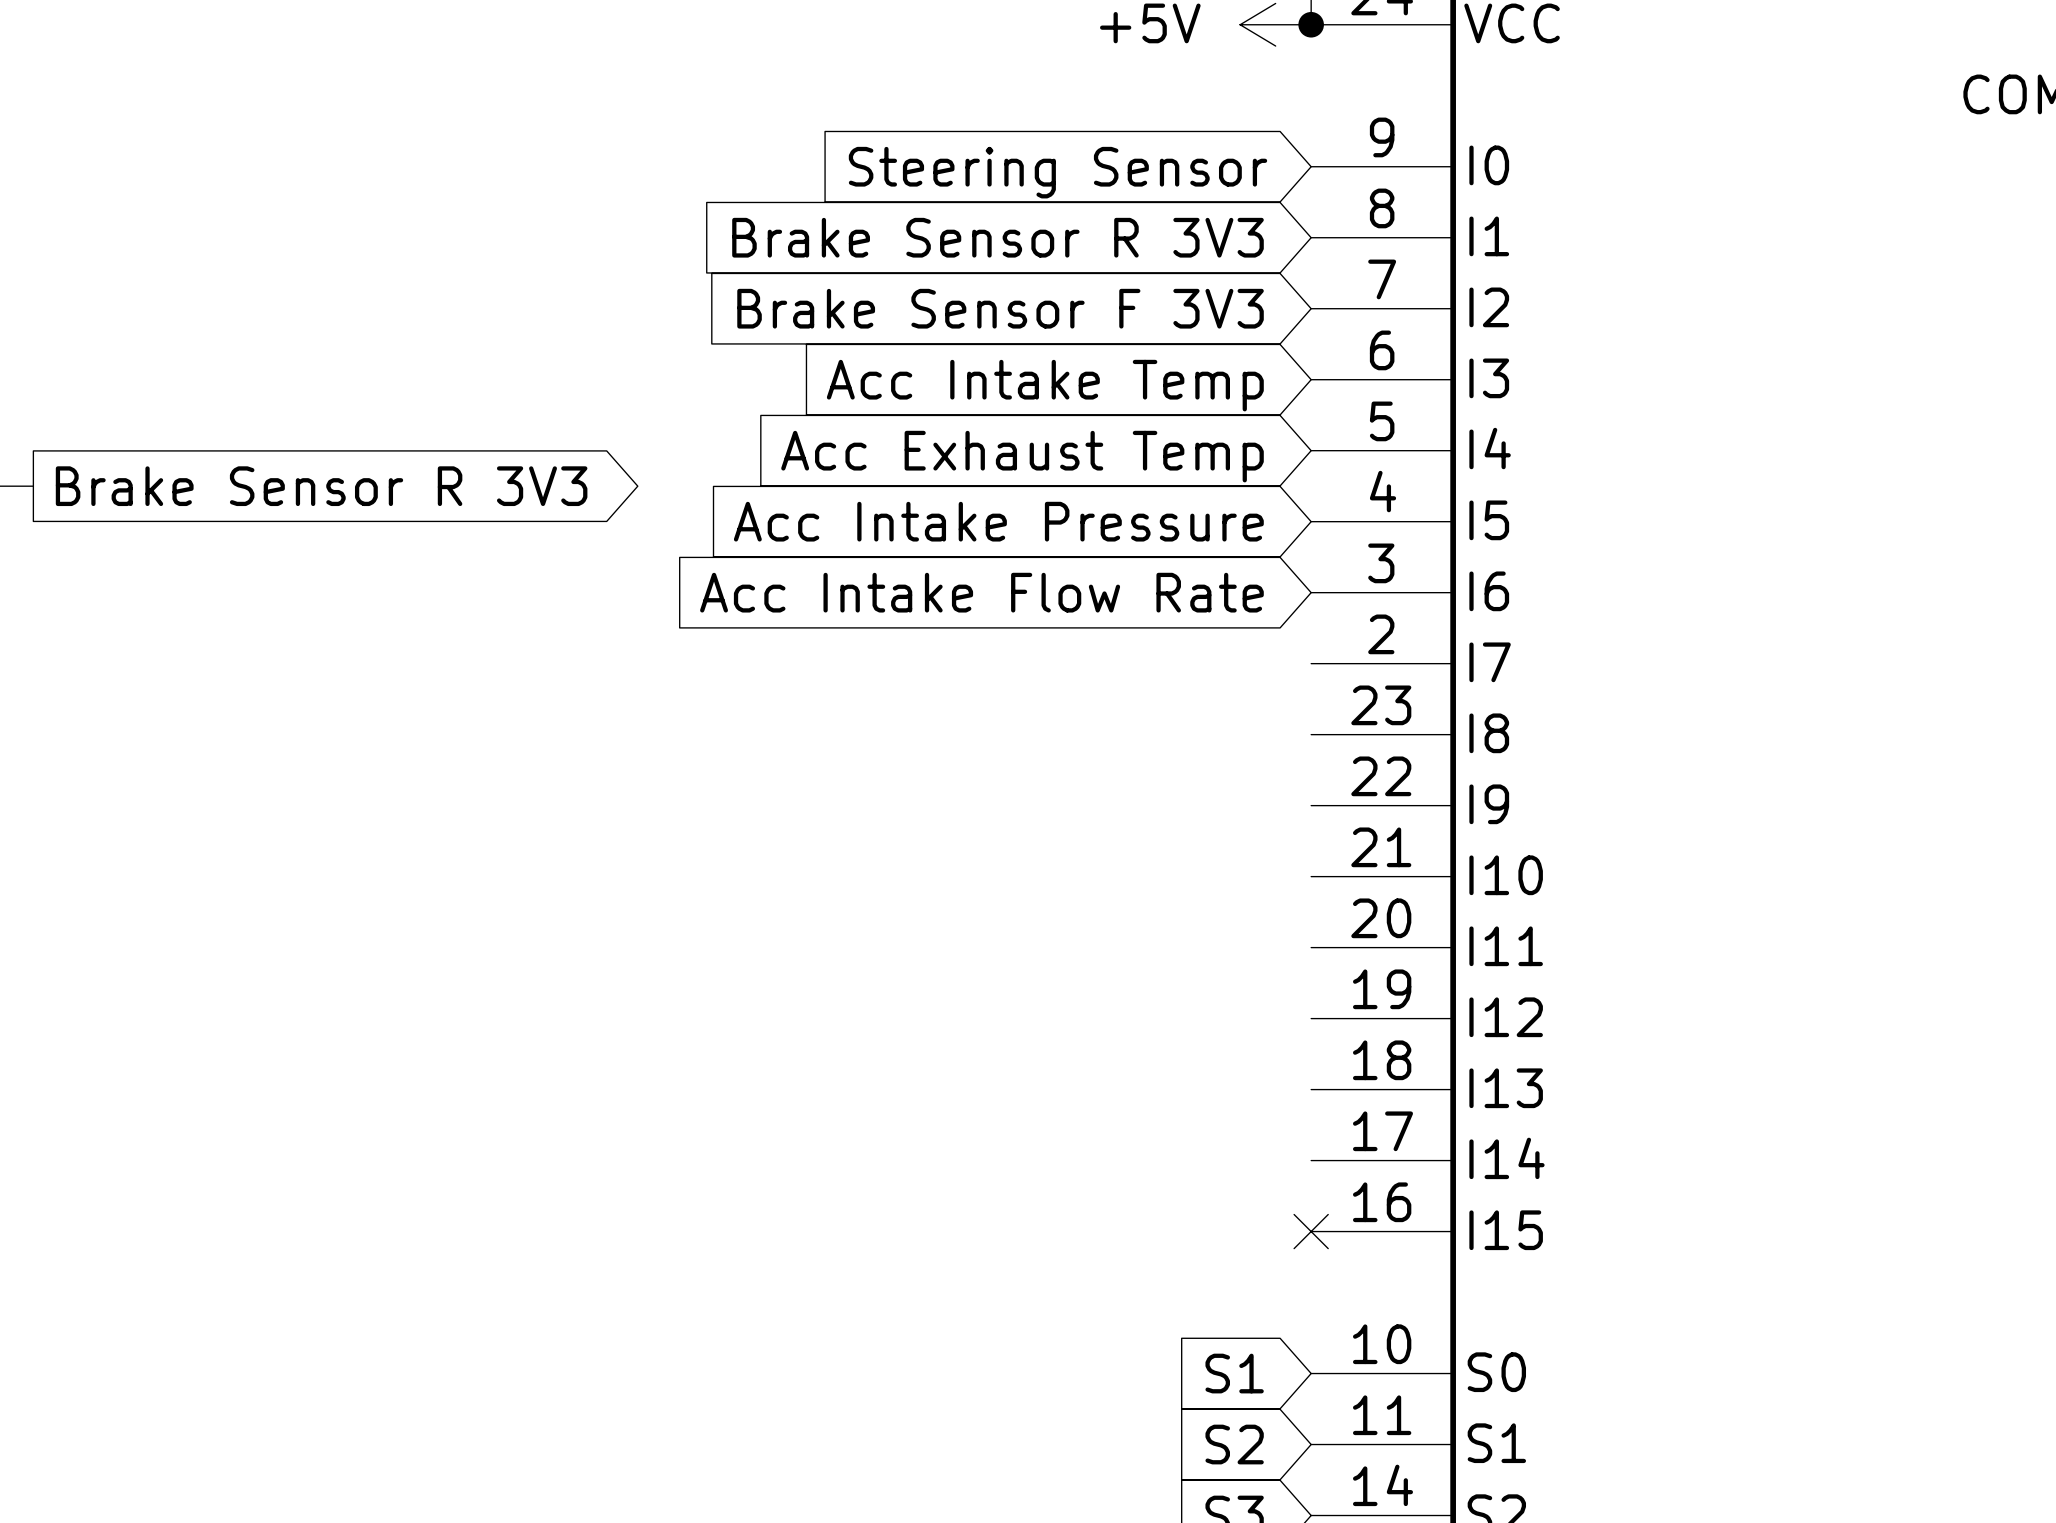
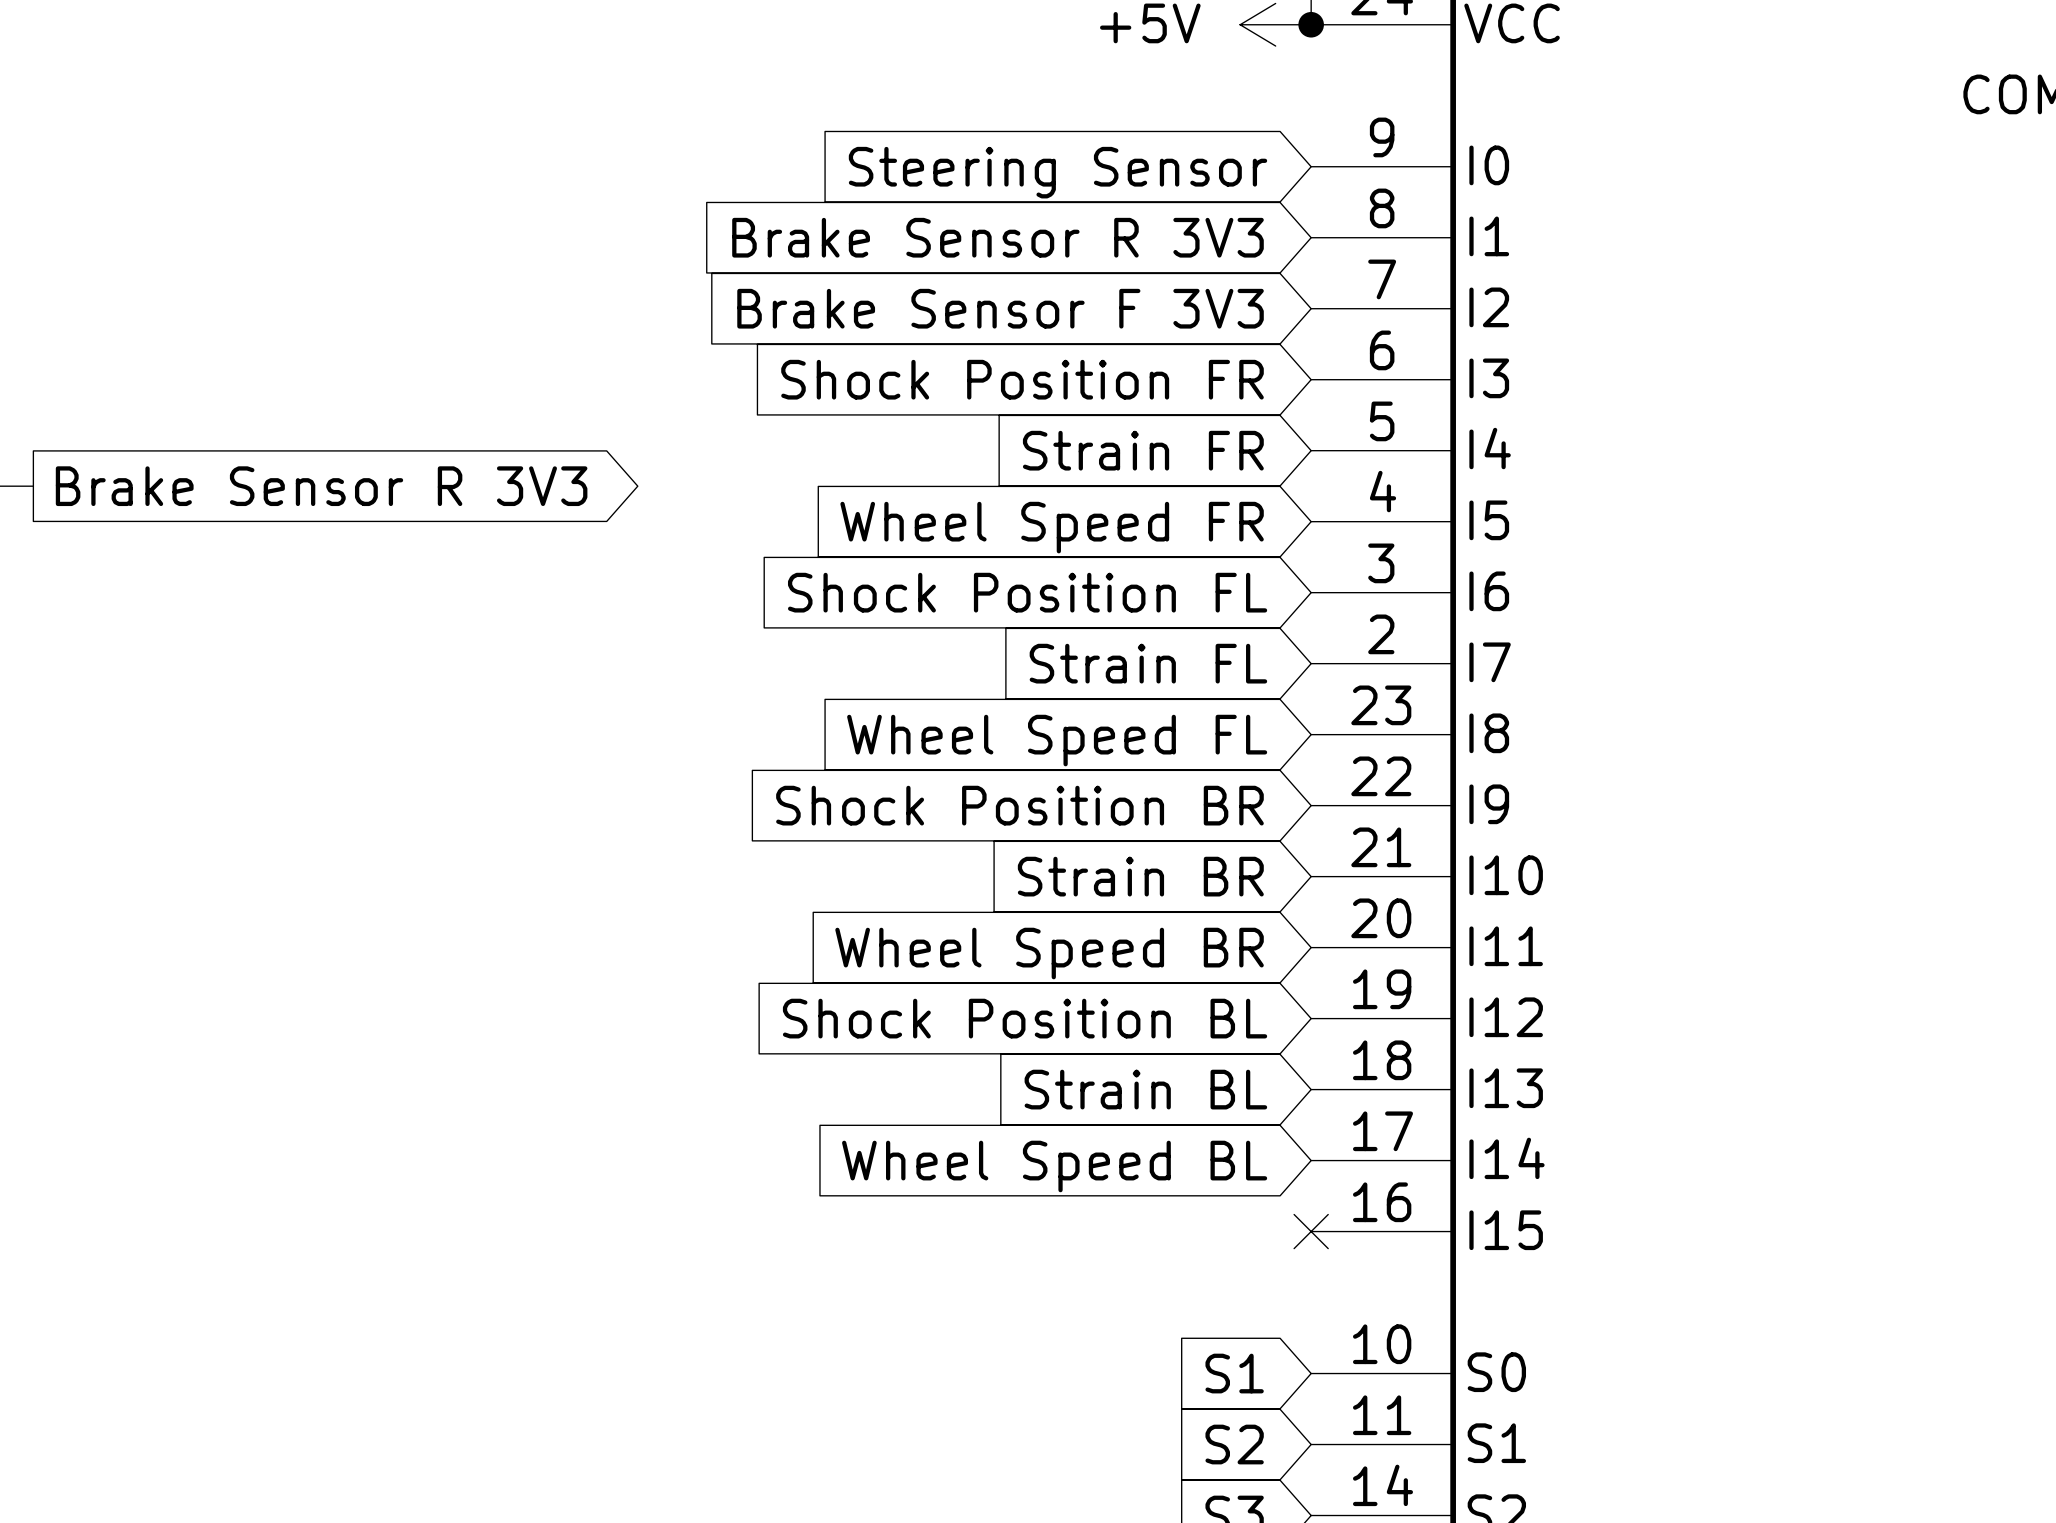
global label: Acc Intake Temp (1045, 385) -> Shock Position FR (1022, 379)
global label: Acc Exhaust Temp (1022, 456) -> Strain FR (1143, 450)
global label: Acc Intake Pressure (998, 521) -> Wheel Speed FR (1052, 527)
global label: Acc Intake Flow Rate (981, 592) -> Shock Position FL (1027, 592)
global label: none -> Strain FL (1148, 663)
global label: none -> Wheel Speed FL (1057, 740)
global label: none -> Shock Position BR (1019, 805)
global label: none -> Strain BR (1140, 876)
global label: none -> Wheel Speed BR (1049, 953)
global label: none -> Shock Position BL (1025, 1018)
global label: none -> Strain BL (1145, 1089)
global label: none -> Wheel Speed BL (1054, 1166)

